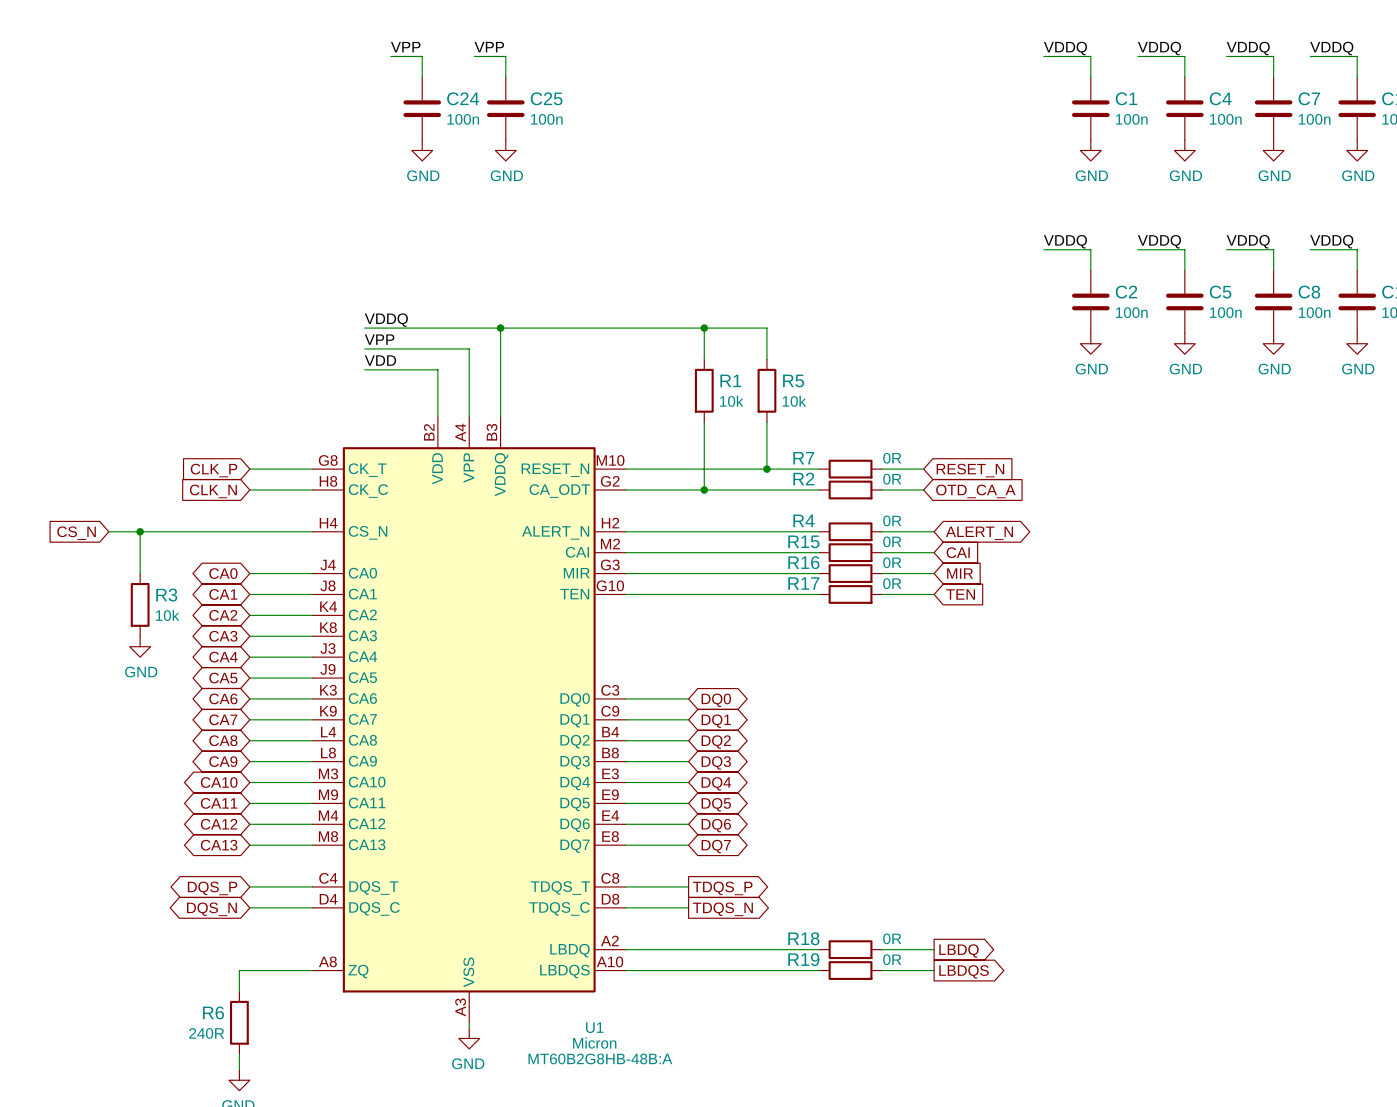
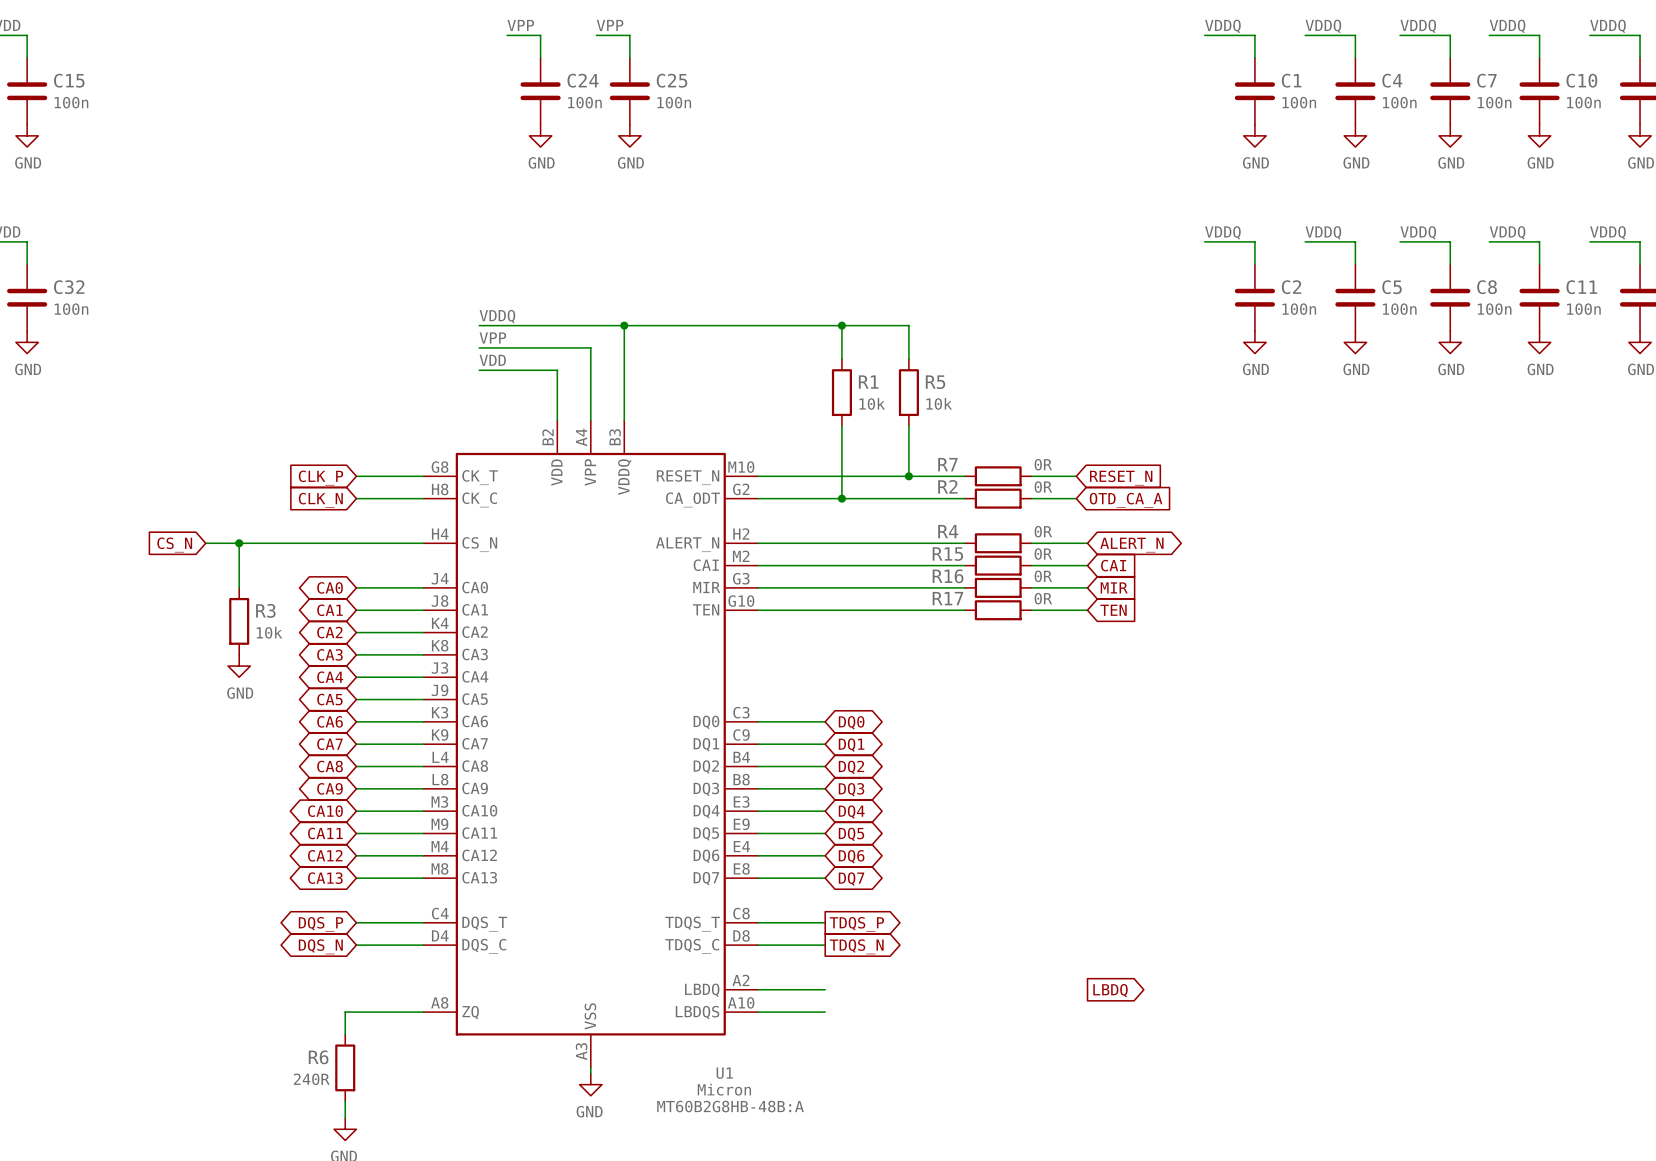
wire: (688, 949) (819, 949) -> none
R18: (850, 949) -> none
wire: (881, 949) (934, 949) -> none
wire: (688, 970) (819, 970) -> none
R19: (850, 970) -> none
wire: (881, 970) (934, 970) -> none
global label: LBDQS (964, 971) -> none

